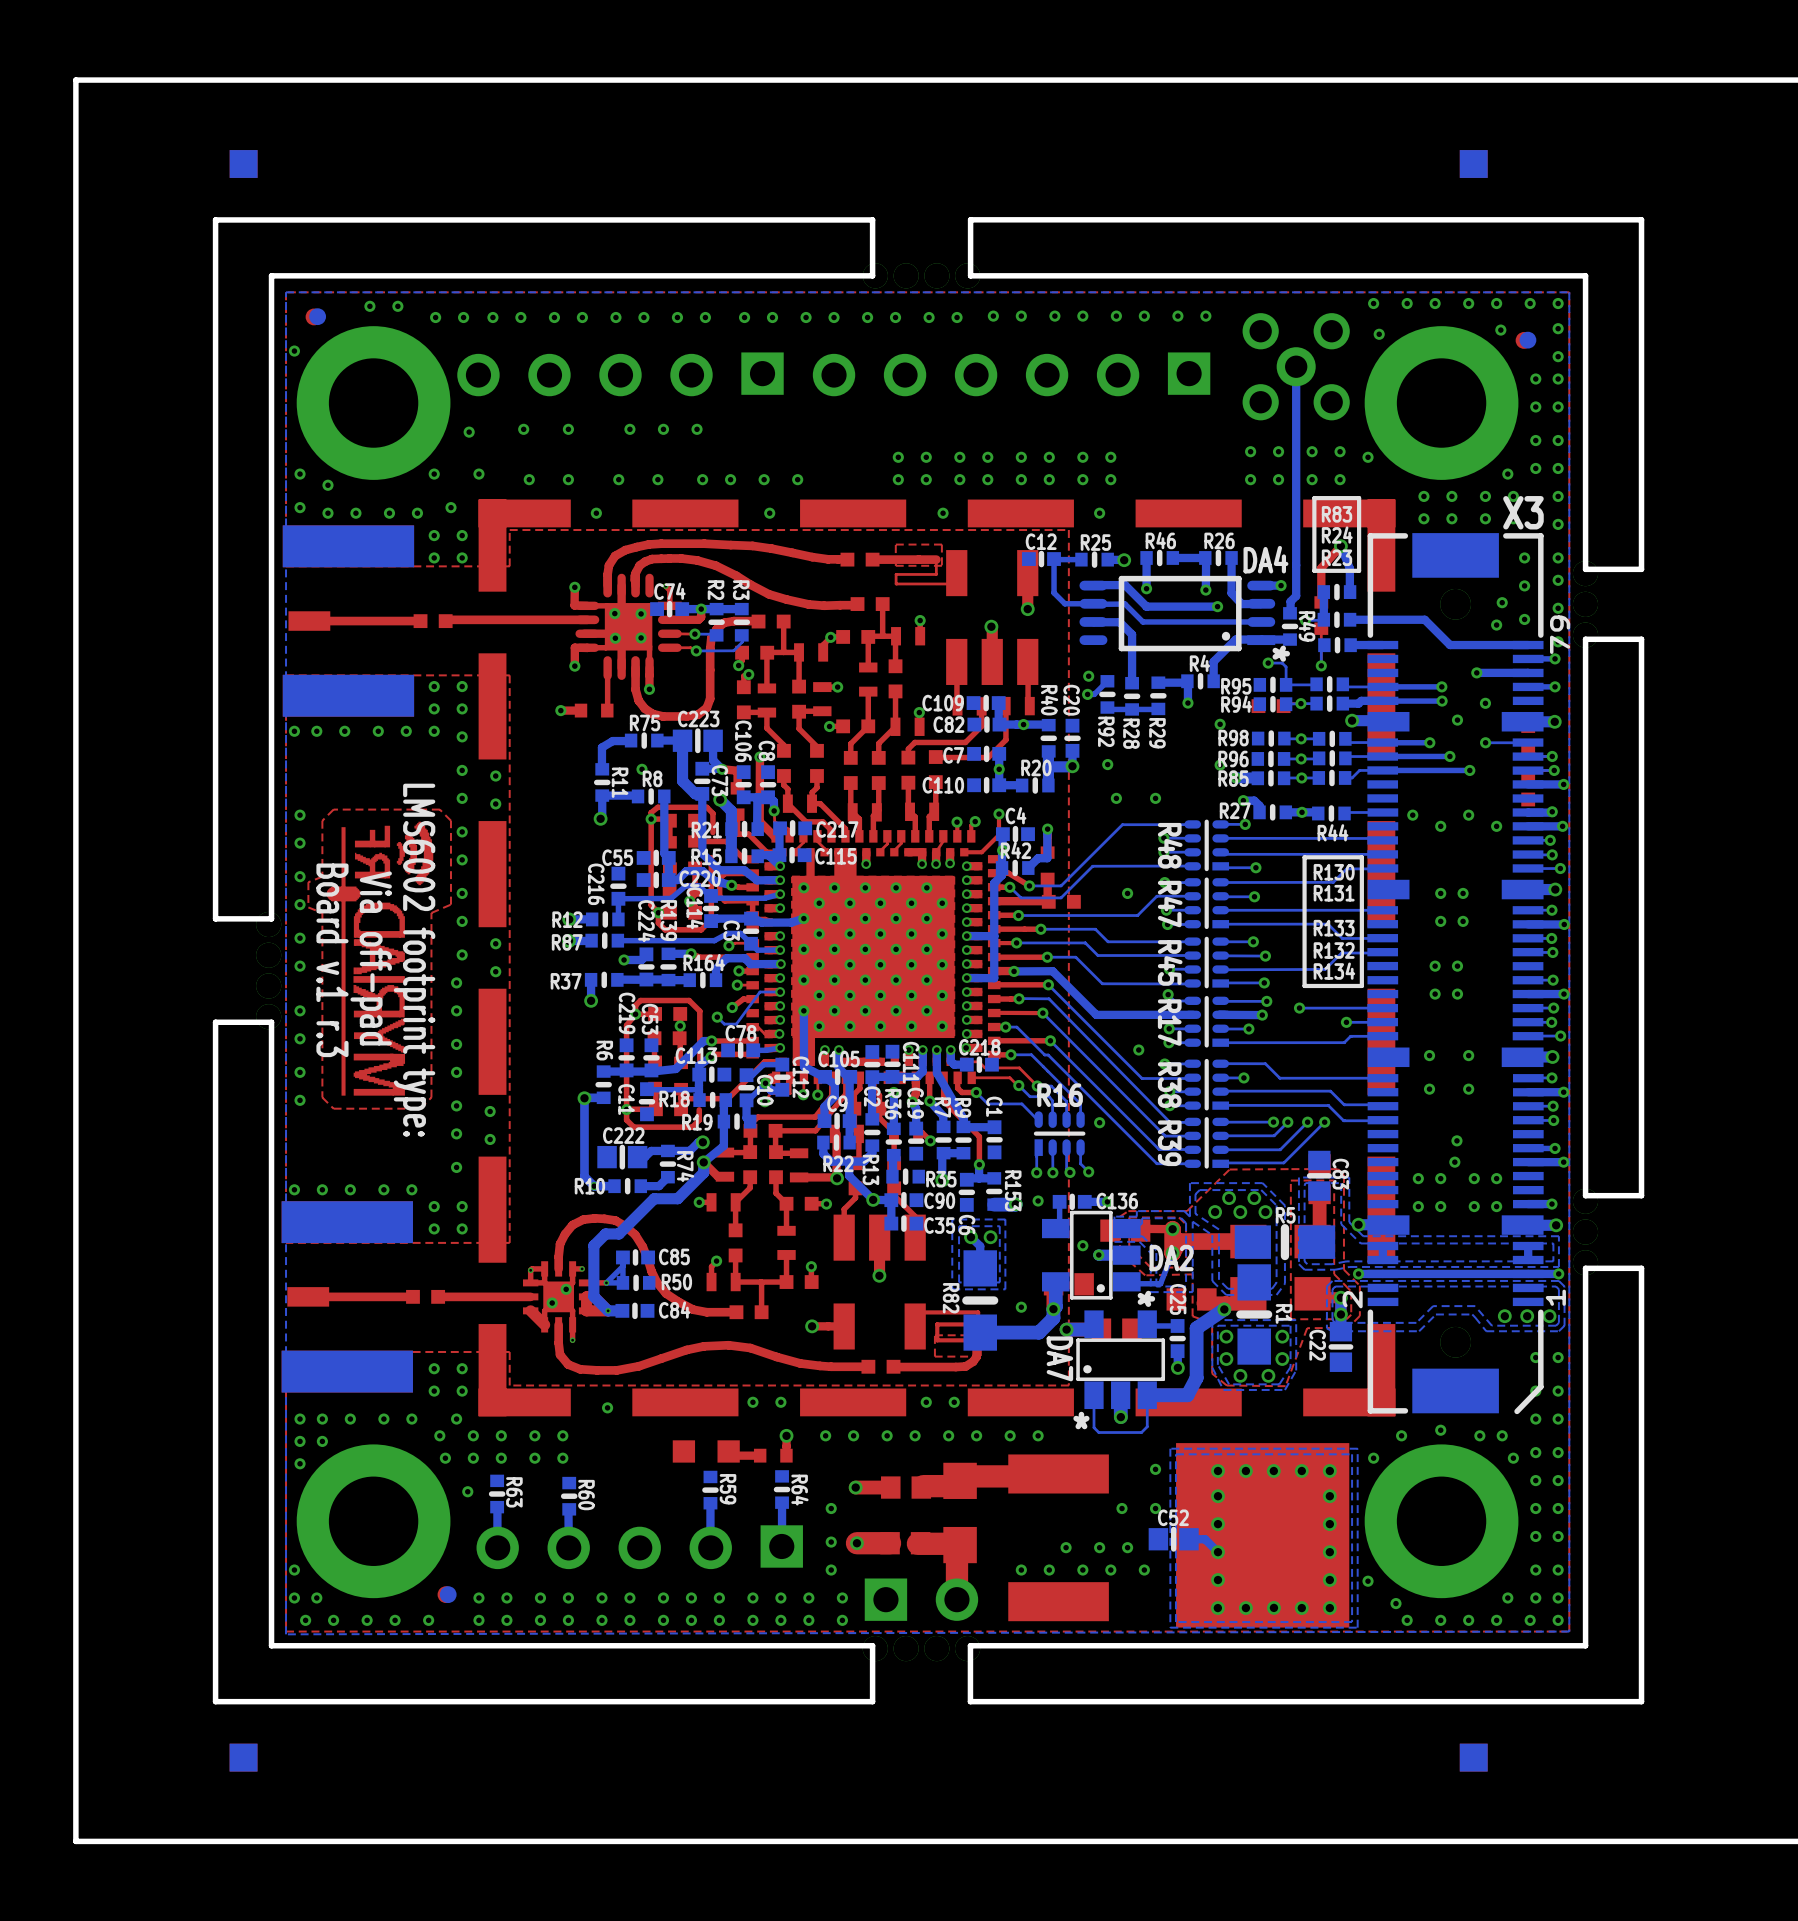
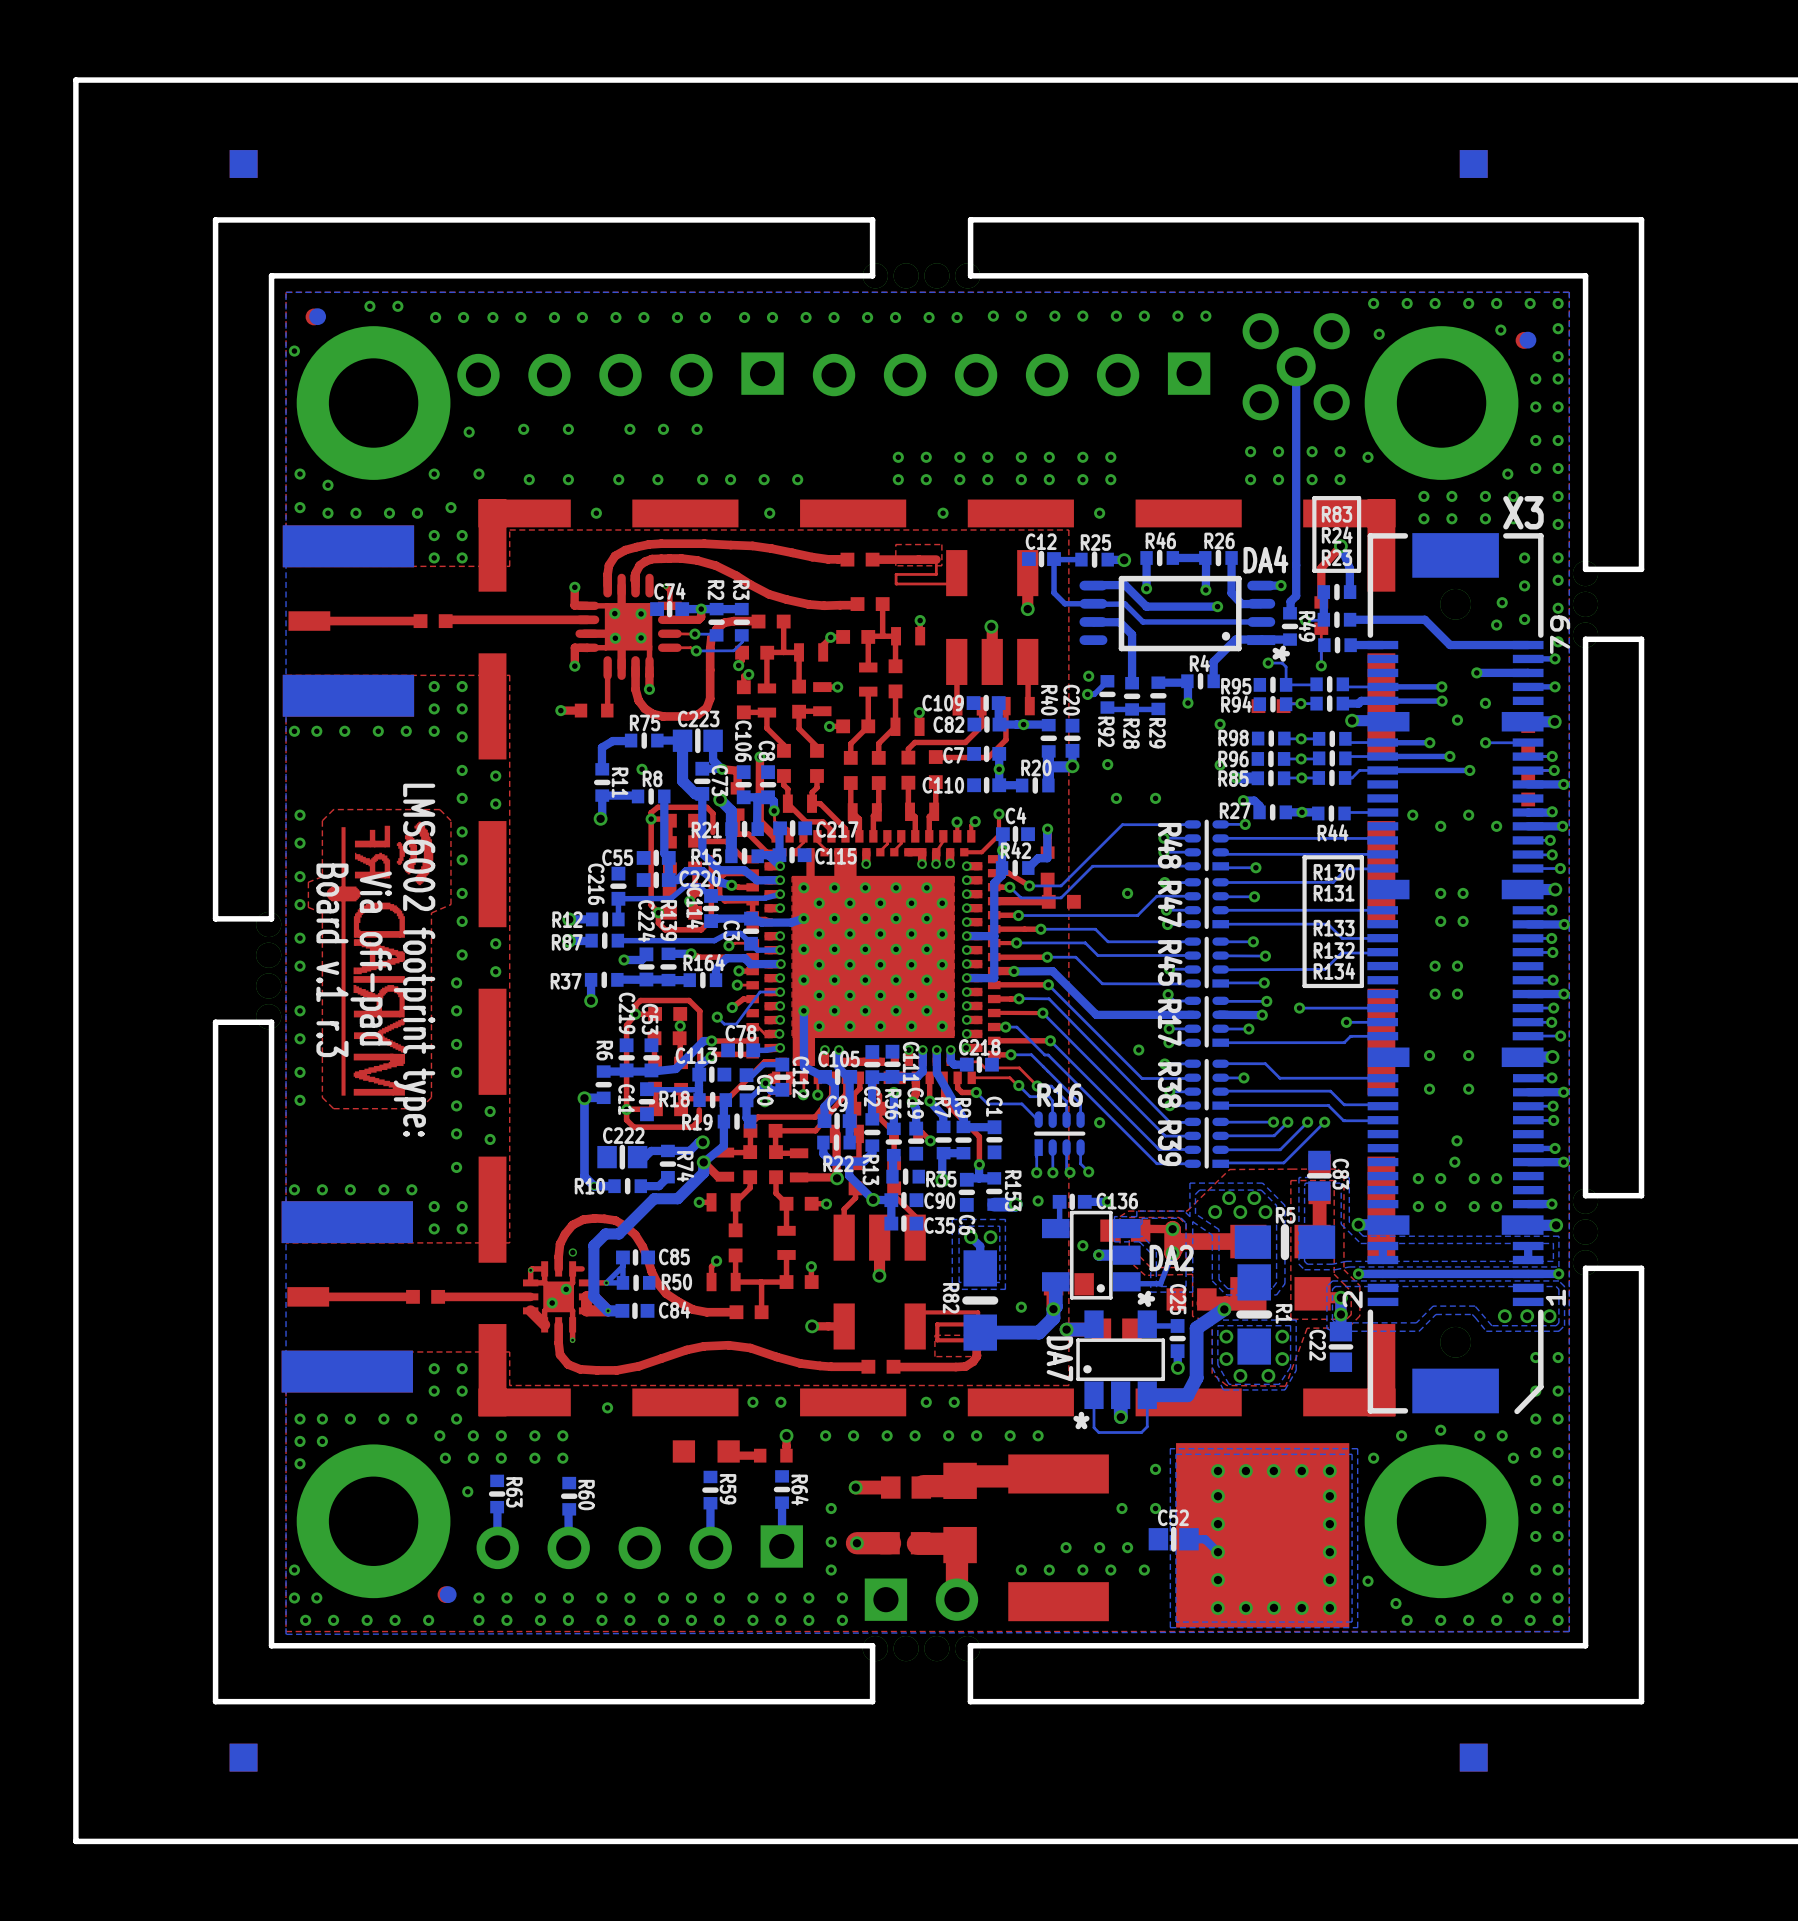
via: none -> (572, 1252)
via: (582, 1268) -> none

